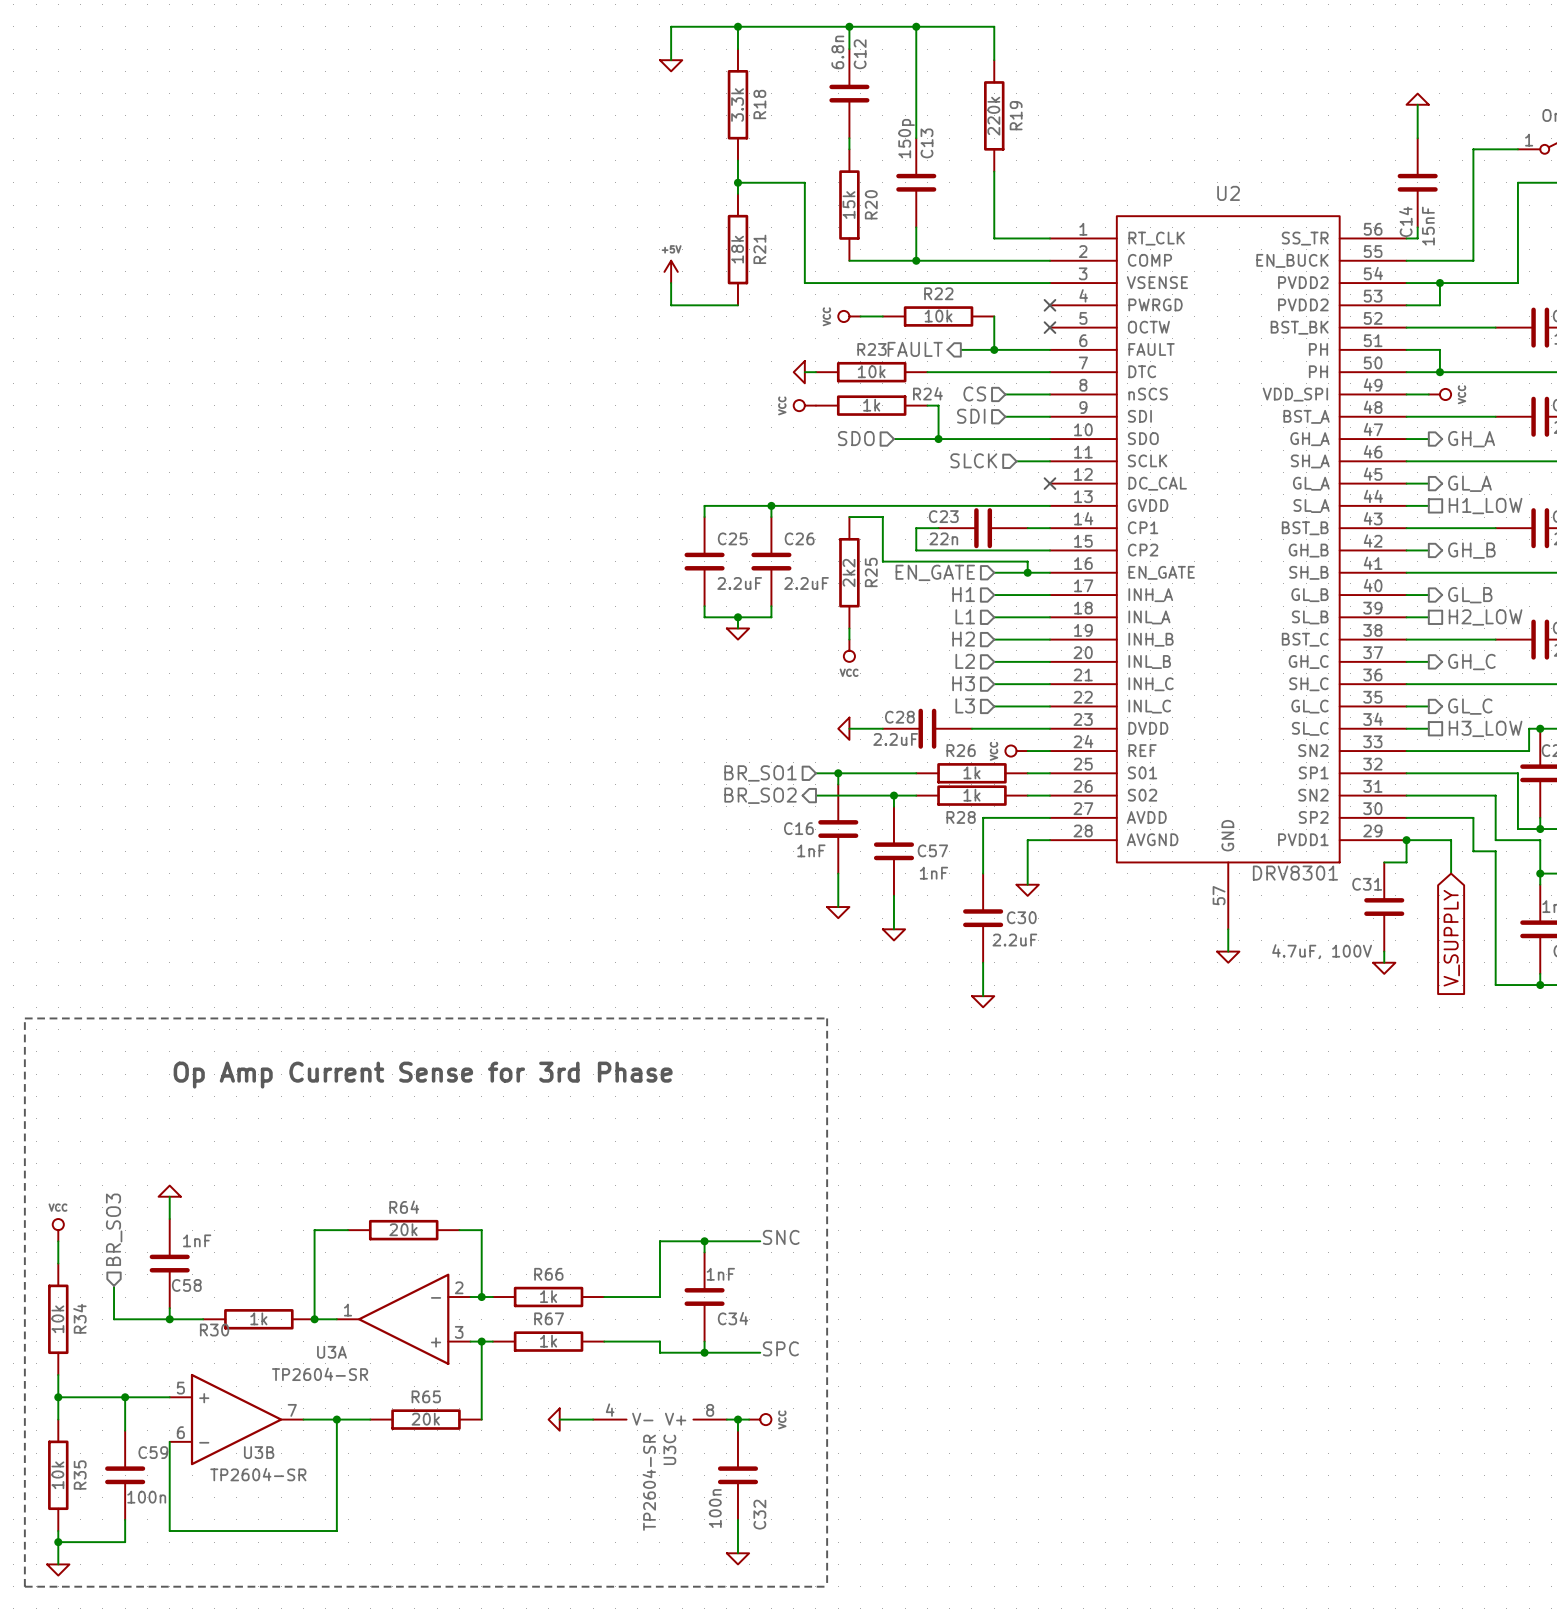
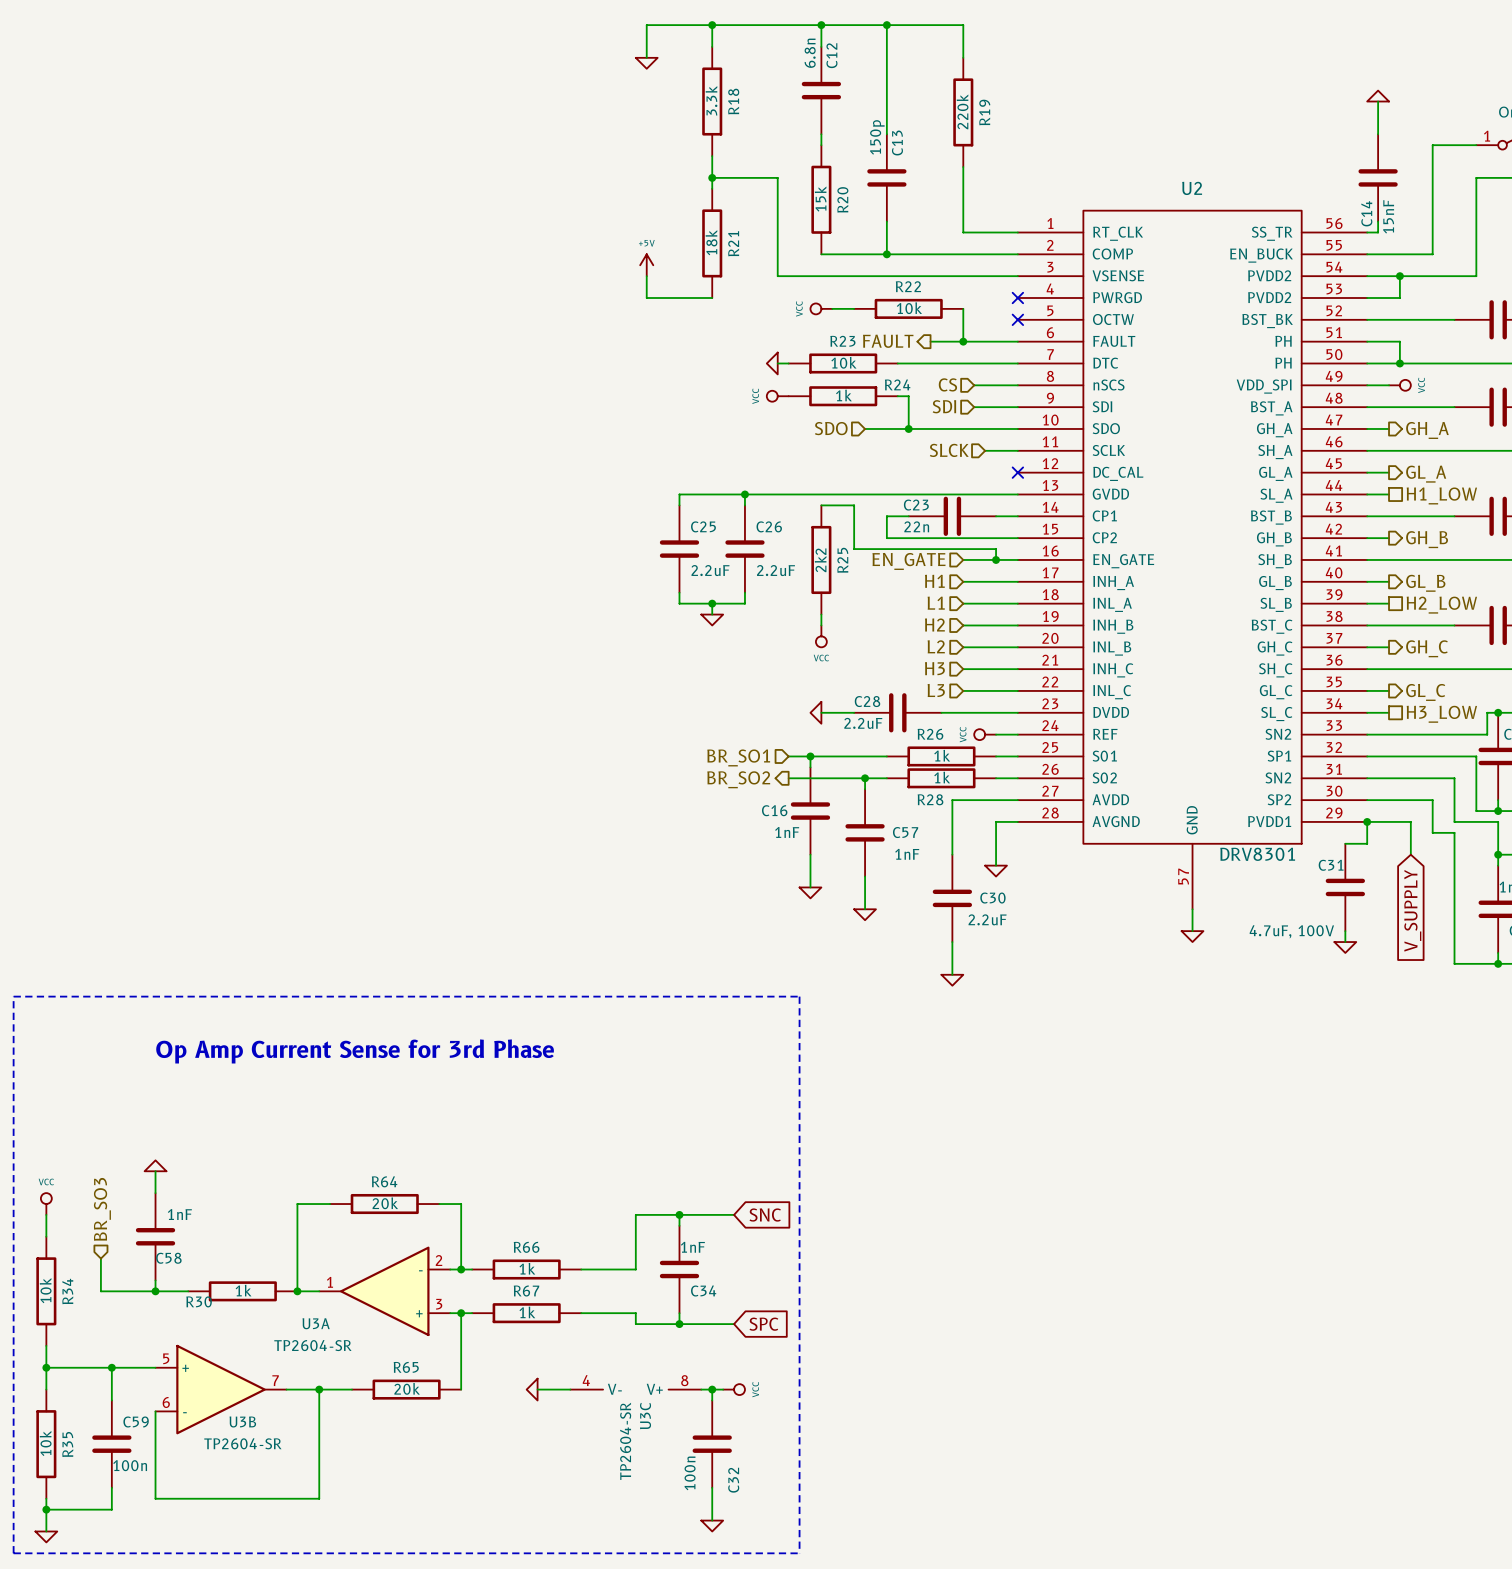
label: SNC (781, 1237) -> none
global label: none -> SNC (765, 1215)
label: SPC (780, 1348) -> none
global label: none -> SPC (763, 1324)

